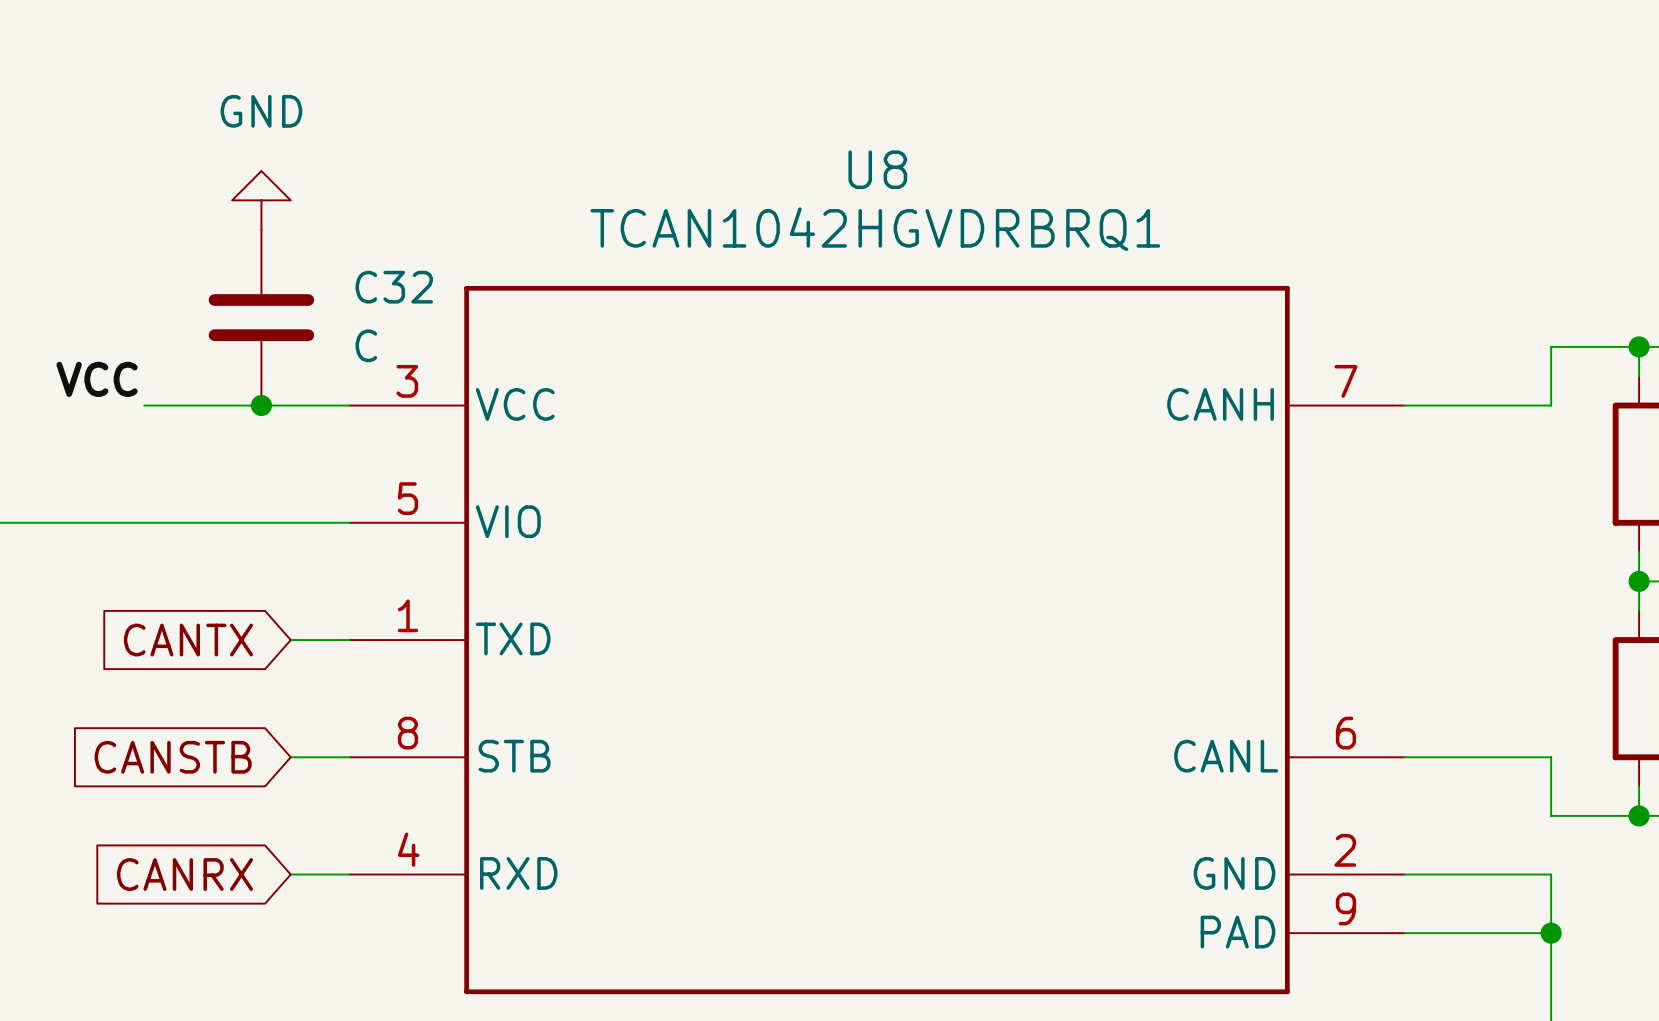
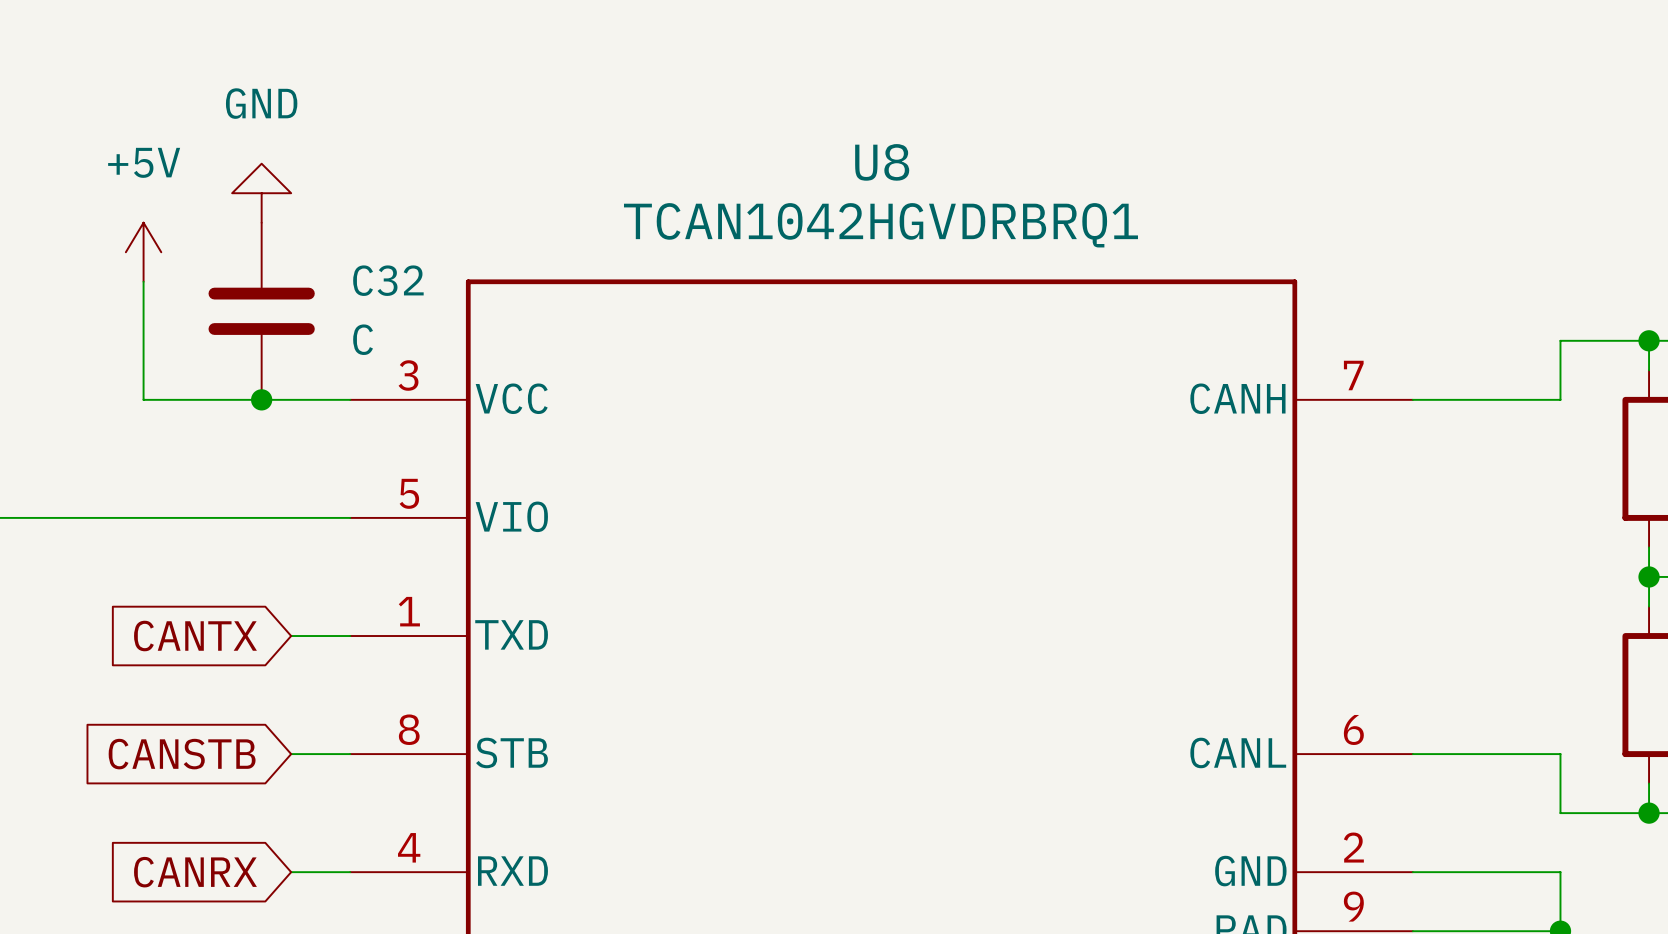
power symbol: none -> +5V (143, 252)
wire: none -> (143, 281) (143, 399)
label: VCC (97, 379) -> none

